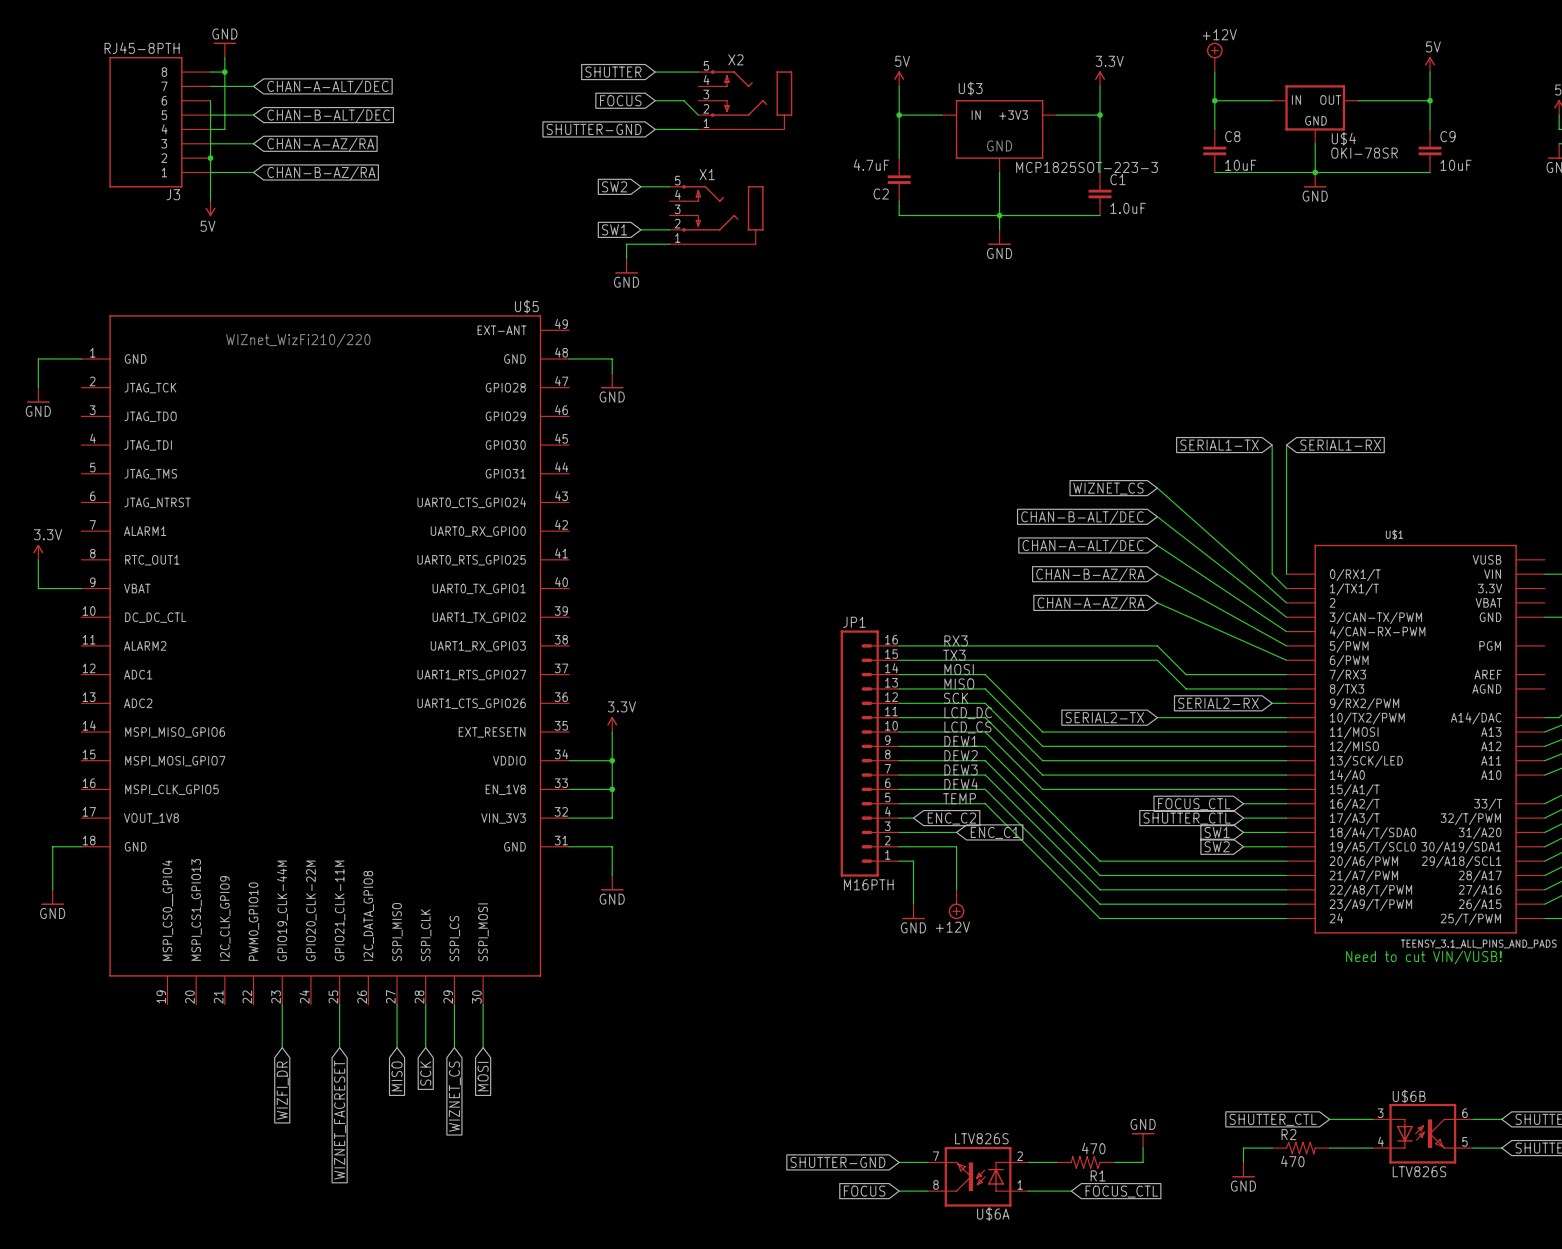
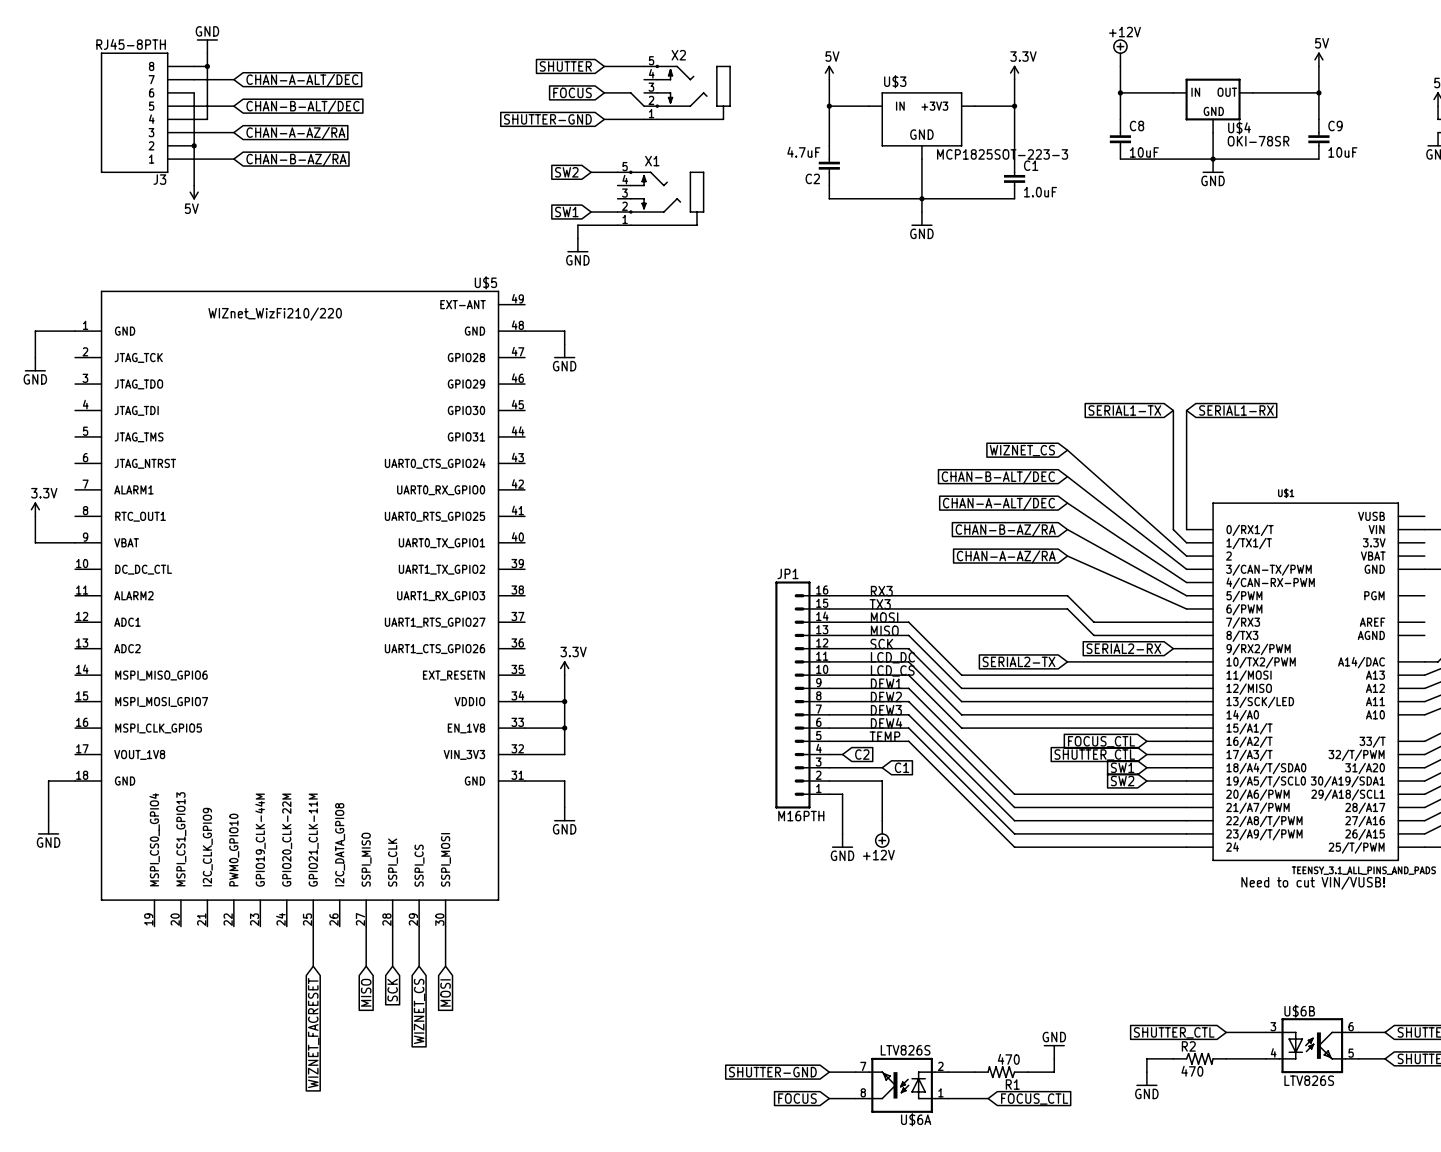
global label: ENC_C2 (951, 818) -> C2 (862, 754)
global label: ENC_C1 (994, 832) -> C1 (901, 767)
wire: (282, 1004) (282, 1047) -> none
global label: WIZFI_DR (282, 1090) -> none

